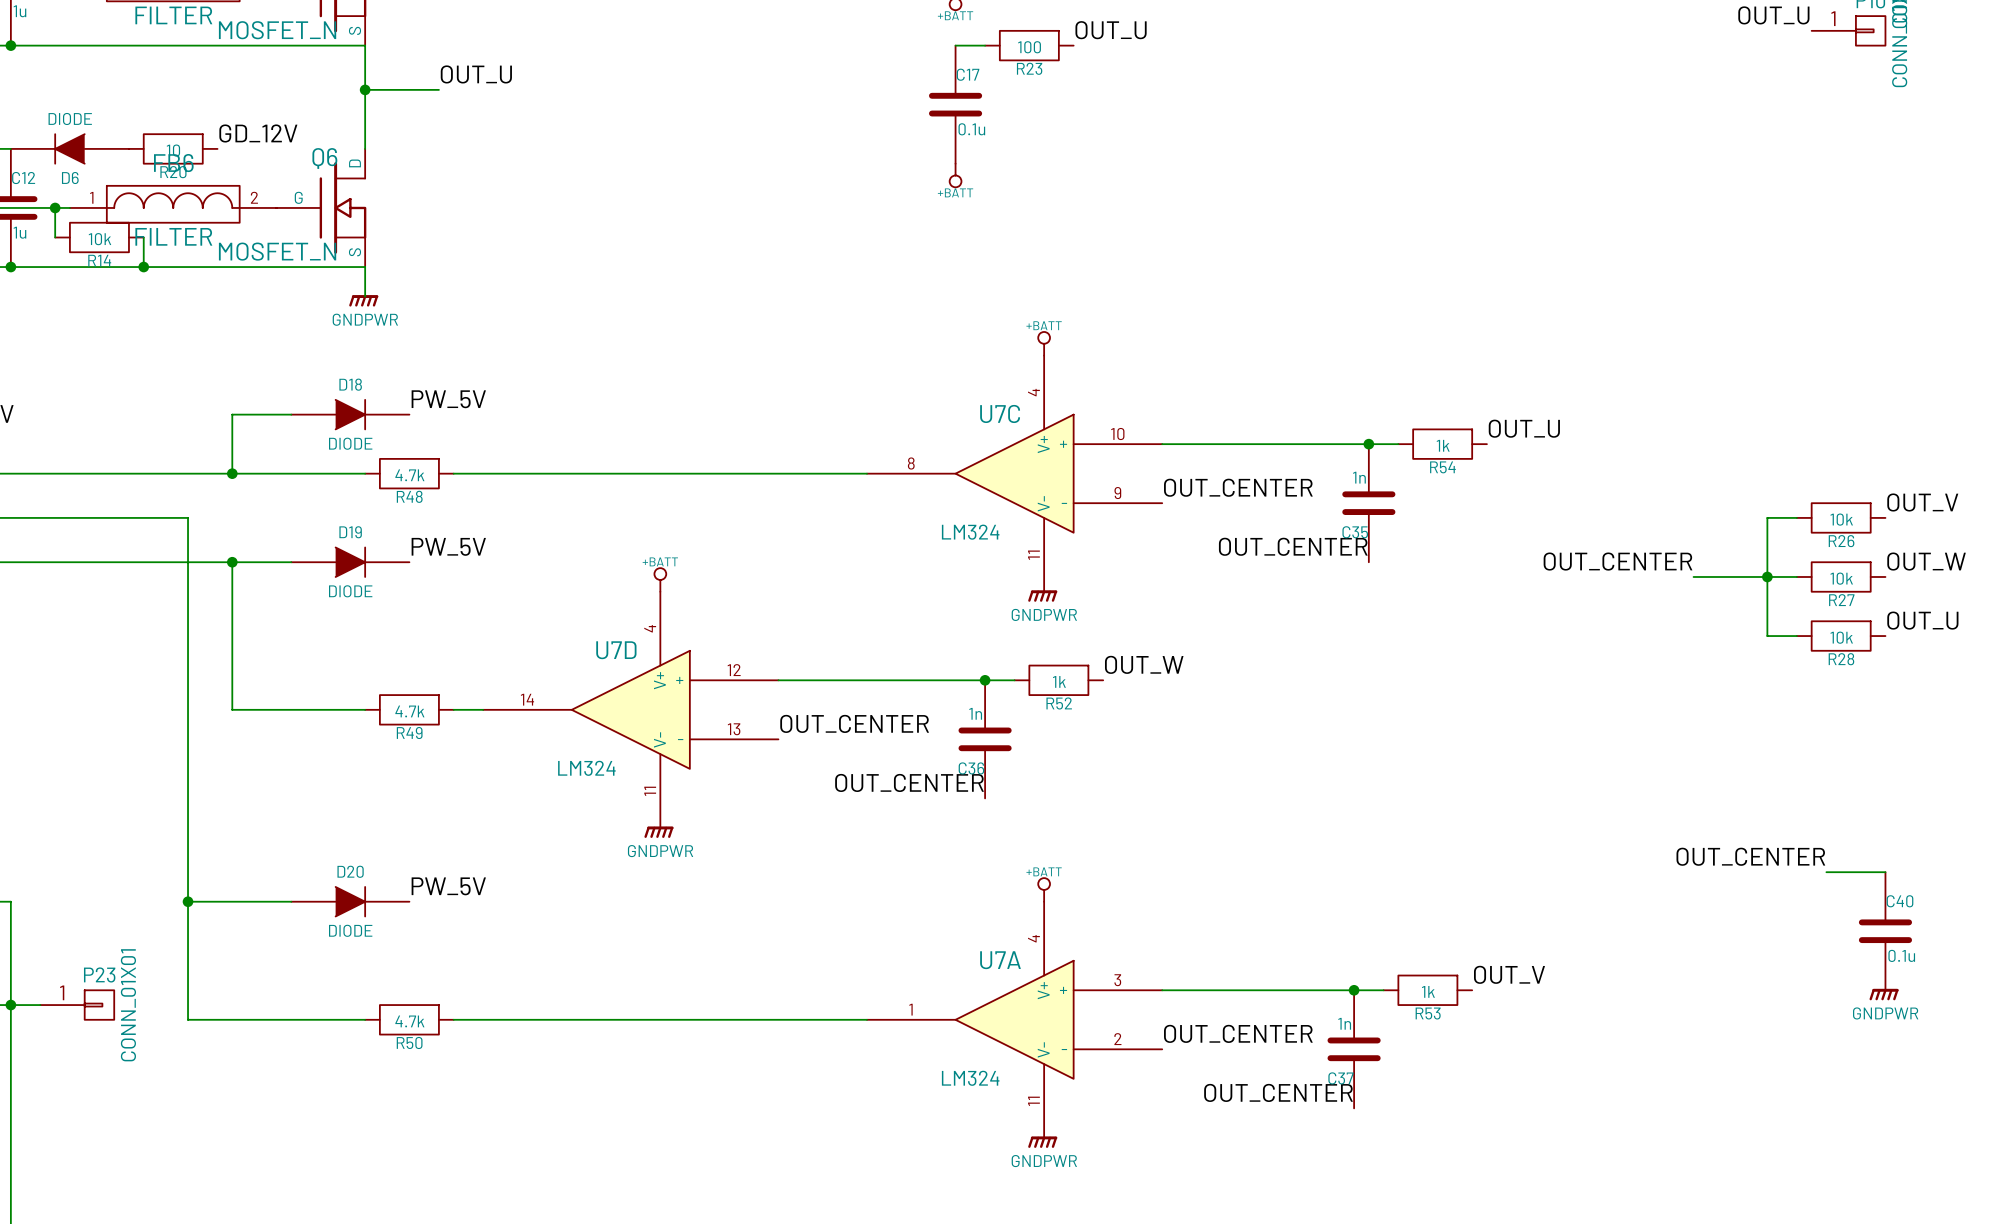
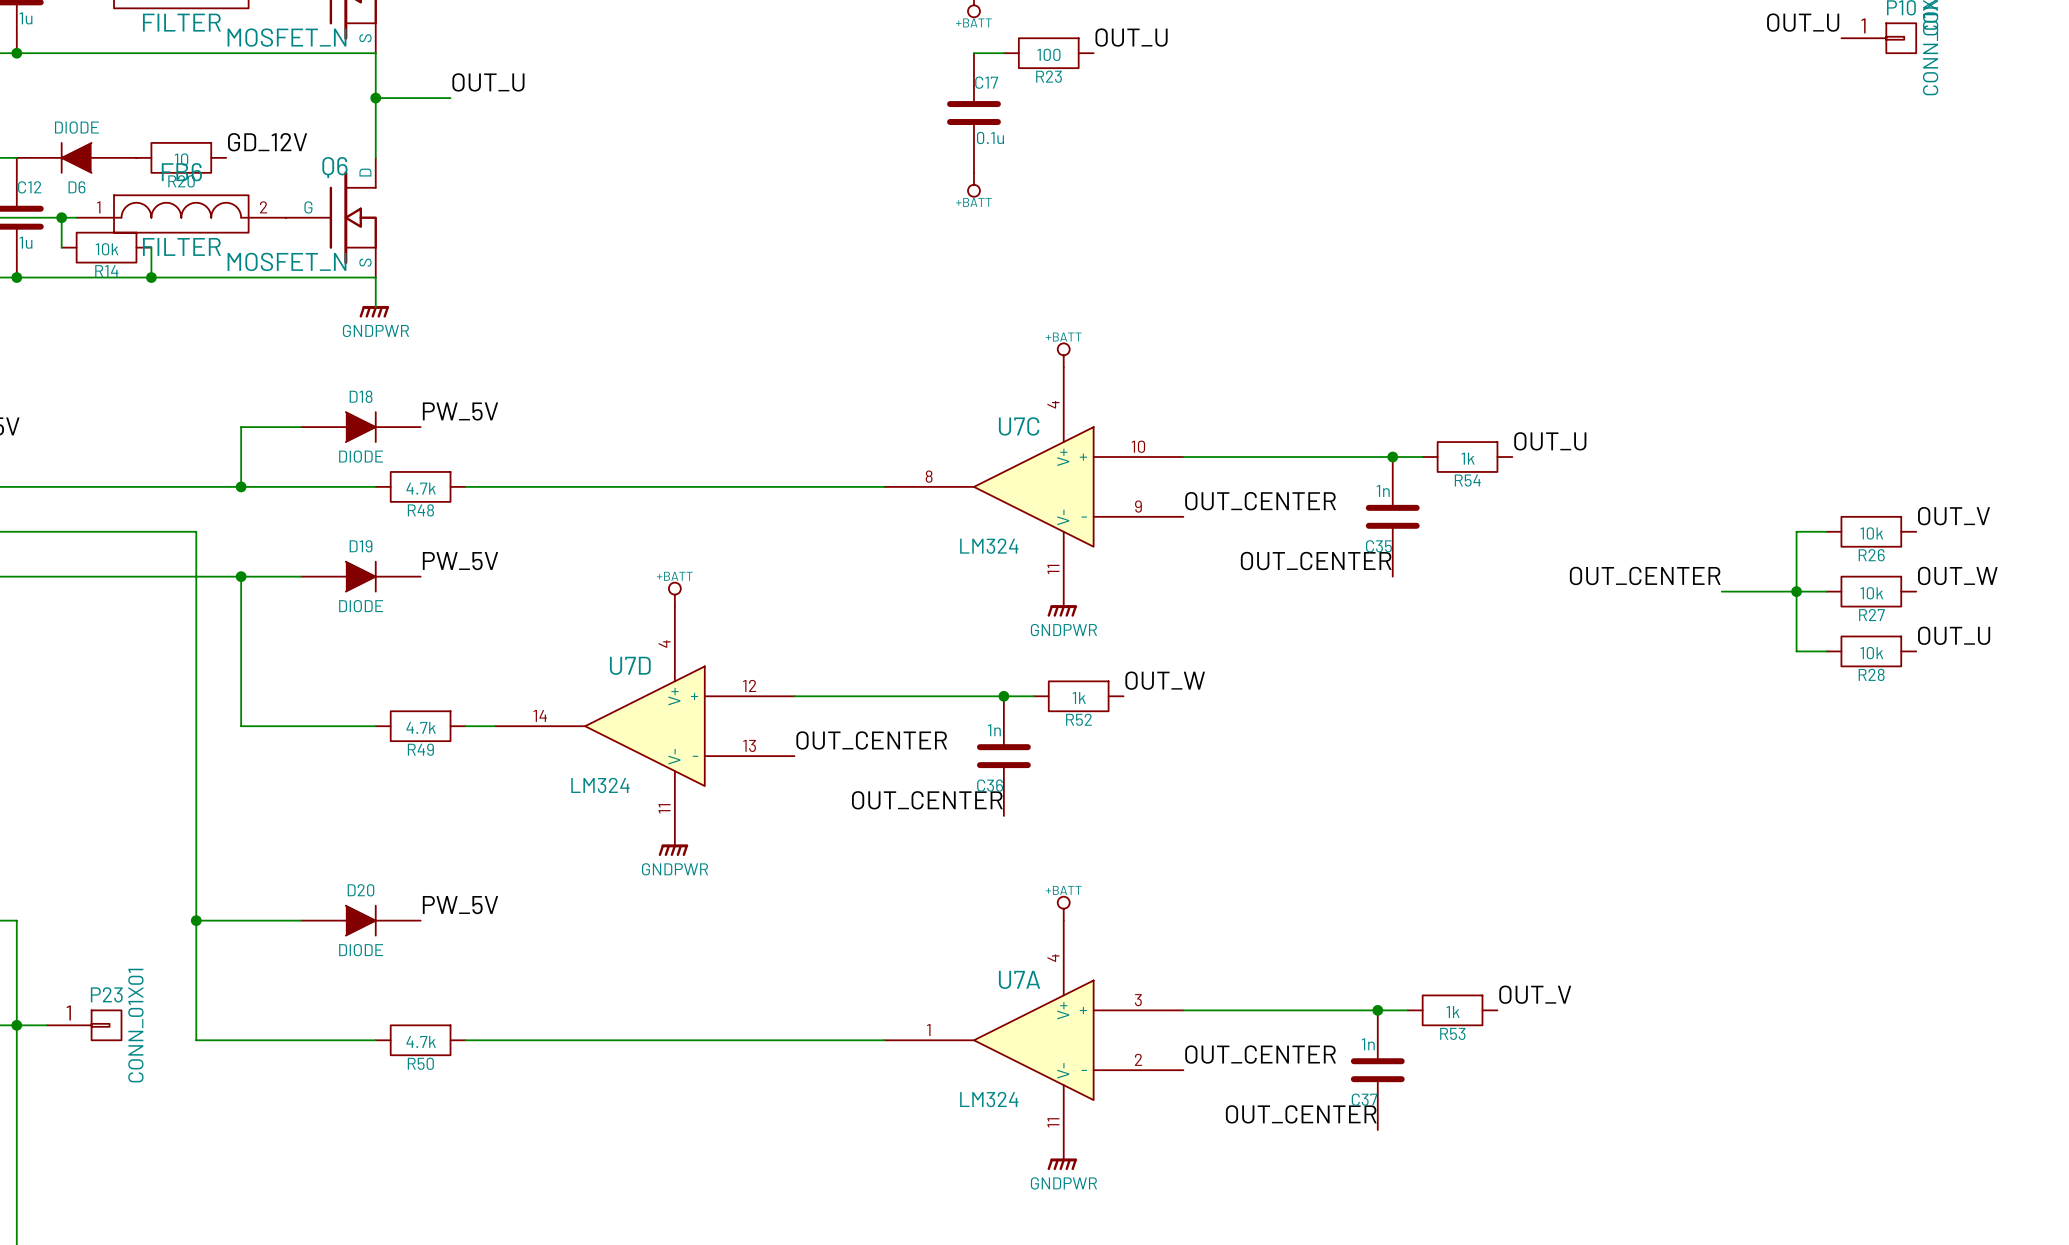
label: OUT_CENTER (1750, 856) -> none
wire: (1826, 872) (1885, 872) -> none
C40: 0.1u (1885, 931) -> none
power symbol: GNDPWR (1884, 994) -> none

